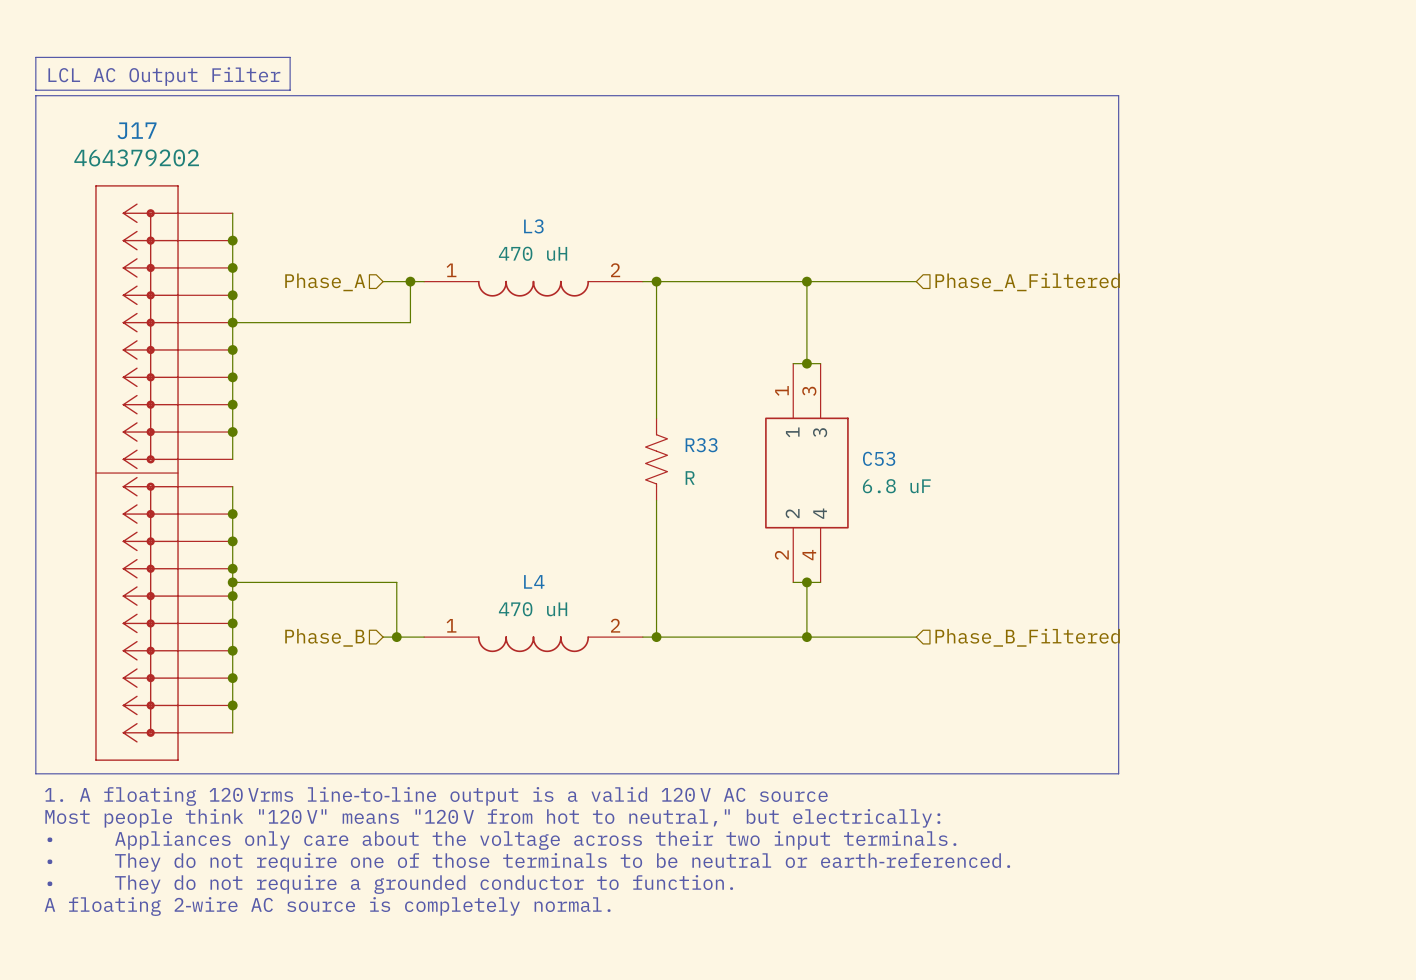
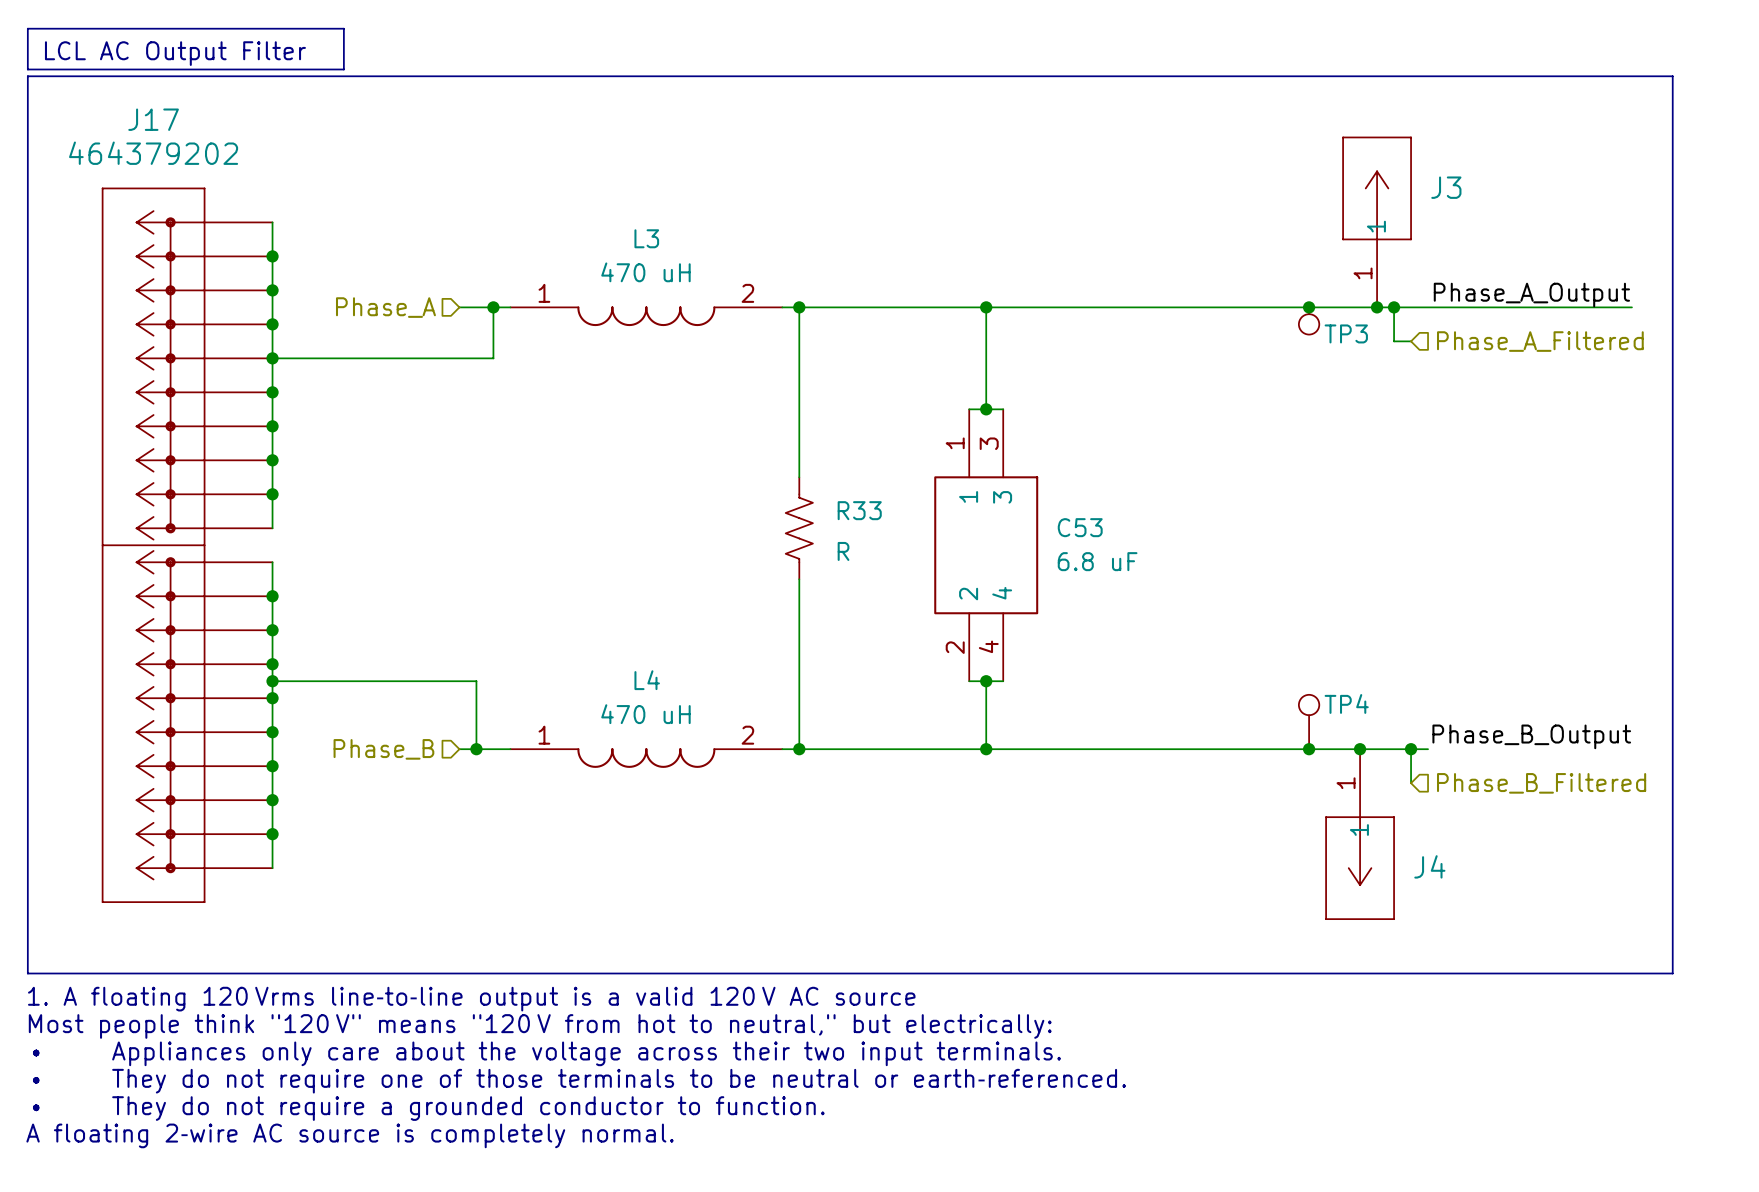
line: (1118, 95) (1118, 773) (35, 773) -> (1373, 76) (1672, 76) (1672, 973) (27, 973) (27, 919)
J3: none -> (1377, 221)
label: none -> Phase_A_Output (1531, 295)
wire: none -> (1122, 307) (1631, 307)
junction: none -> (1309, 307)
junction: none -> (1377, 307)
wire: none -> (1394, 307) (1394, 341) (1411, 341)
junction: none -> (1394, 307)
hierarchical label position: Phase_A_Filtered (1027, 282) -> Phase_A_Filtered (1540, 341)
TP3: none -> (1309, 320)
TP4: none -> (1309, 722)
label: none -> Phase_B_Output (1531, 736)
wire: none -> (1122, 749) (1428, 749)
hierarchical label position: Phase_B_Filtered (1027, 637) -> Phase_B_Filtered (1541, 783)
junction: none -> (1309, 749)
junction: none -> (1360, 749)
wire: none -> (1411, 749) (1411, 783)
junction: none -> (1411, 749)
J4: none -> (1360, 834)
text position: 1. A floating 120 Vrms line‑to‑line output is a valid 120 V AC source (436, 796) -> 1. A floating 120 Vrms line‑to‑line output is a valid 120 V AC source (471, 999)
text position: Most people think "120 V" means "120 V from hot to neutral," but electrically: (492, 818) -> Most people think "120 V" means "120 V from hot to neutral," but electrically: (540, 1026)
text position: • Appliances only care about the voltage across their two input terminals. (501, 840) -> • Appliances only care about the voltage across their two input terminals. (546, 1053)
text position: • They do not require one of those terminals to be neutral or earth‑referenced. (528, 862) -> • They do not require one of those terminals to be neutral or earth‑referenced. (579, 1081)
text position: • They do not require a grounded conductor to function. (390, 884) -> • They do not require a grounded conductor to function. (428, 1108)
text position: A floating 2‑wire AC source is completely normal. (327, 906) -> A floating 2‑wire AC source is completely normal. (350, 1135)

